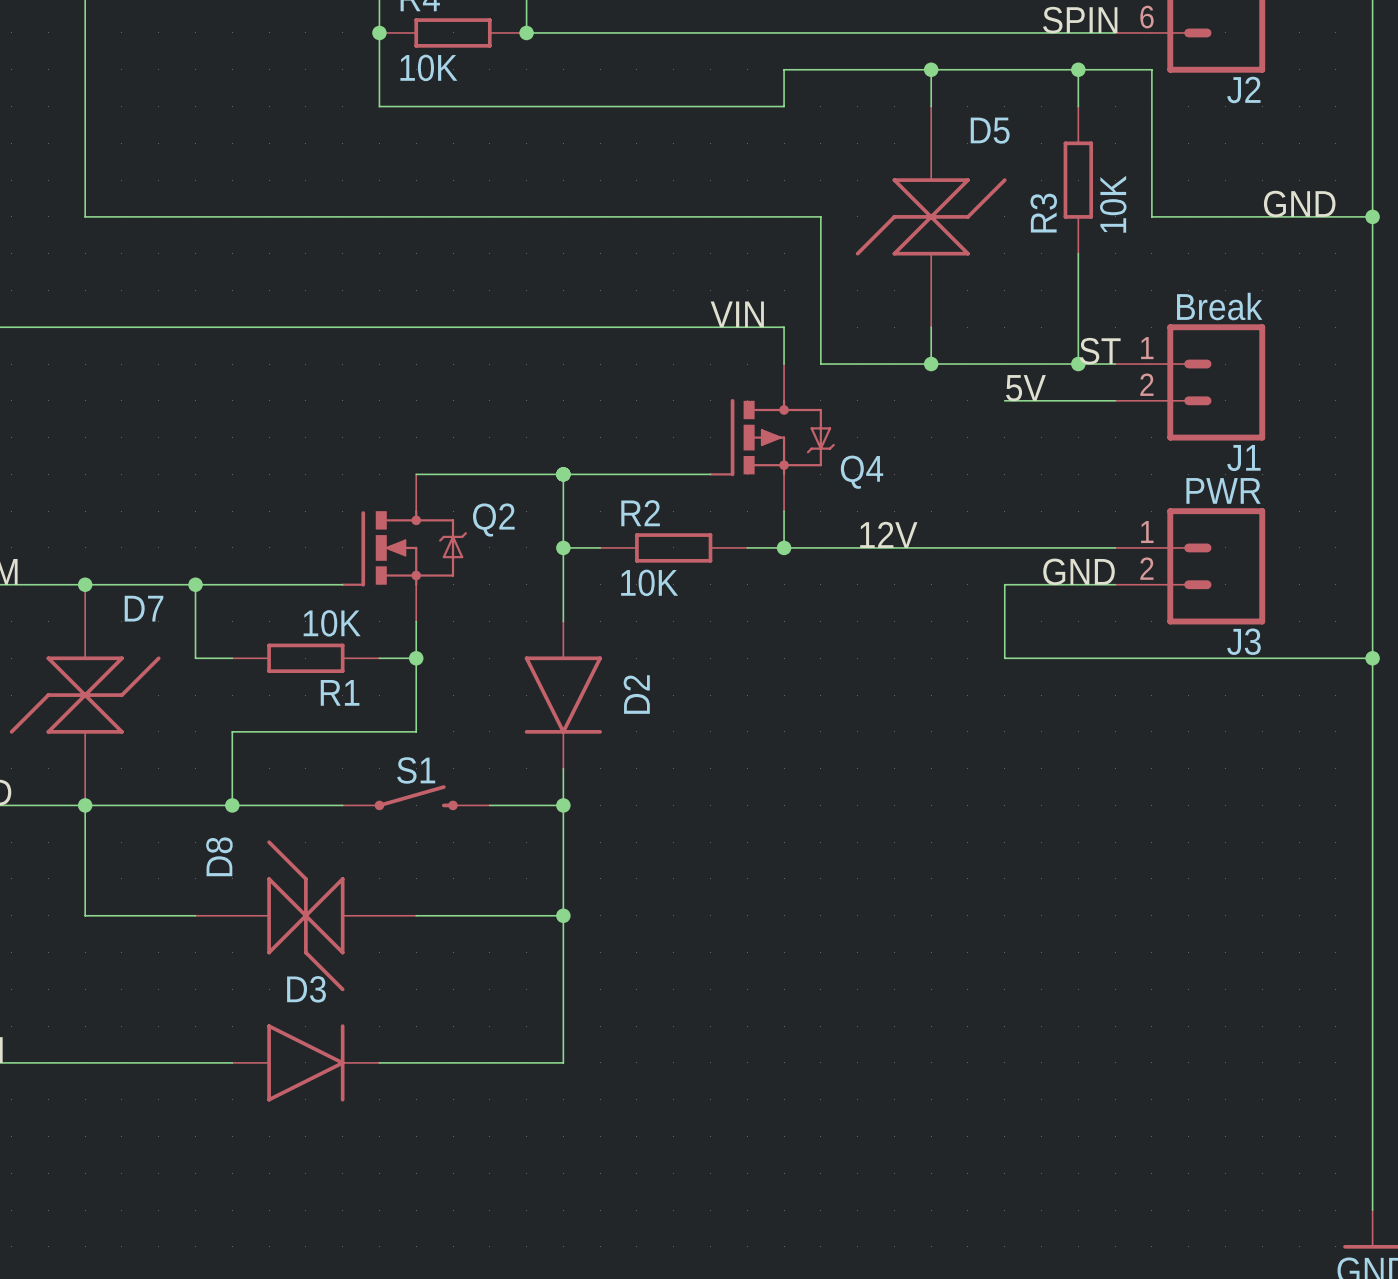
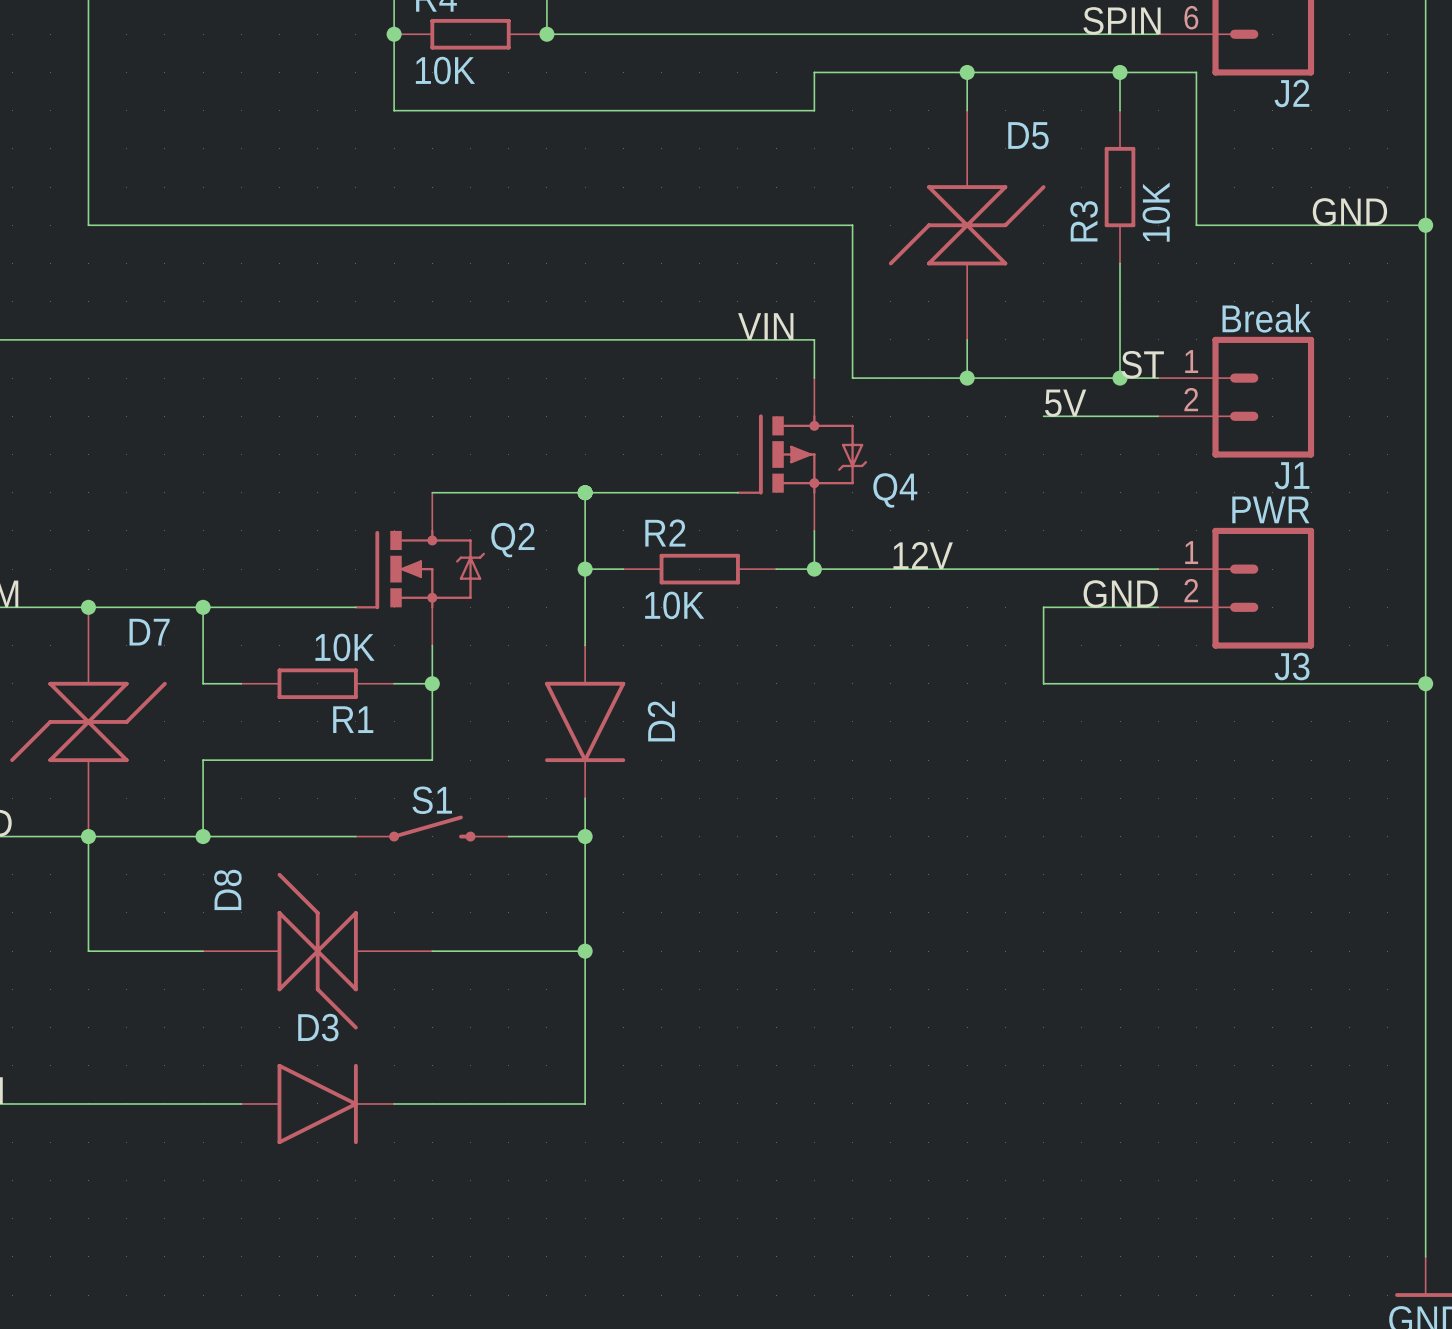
wire: (232, 731) (232, 805) -> (241, 760) (203, 760) (203, 836)
junction position: (232, 805) -> (203, 836)

